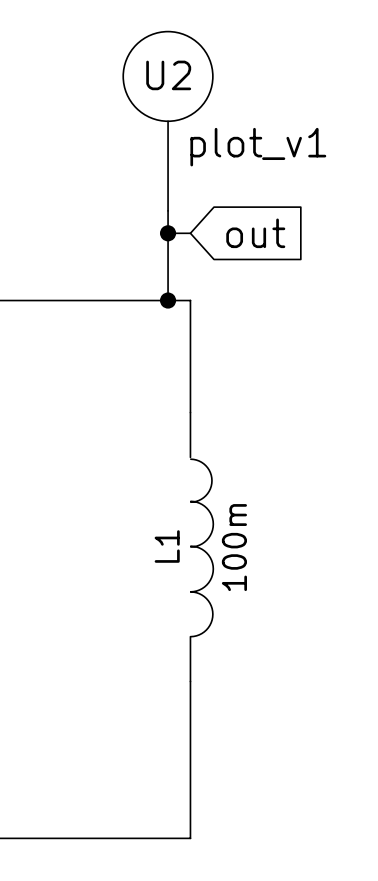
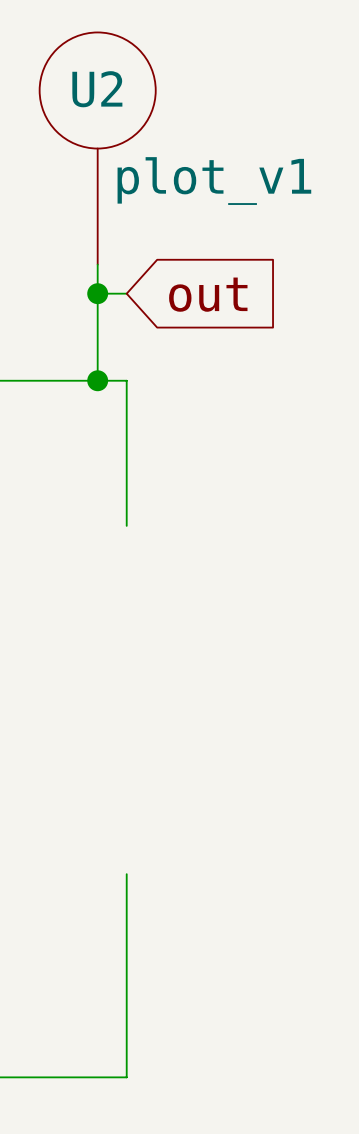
L1: 100m (201, 547) -> none

